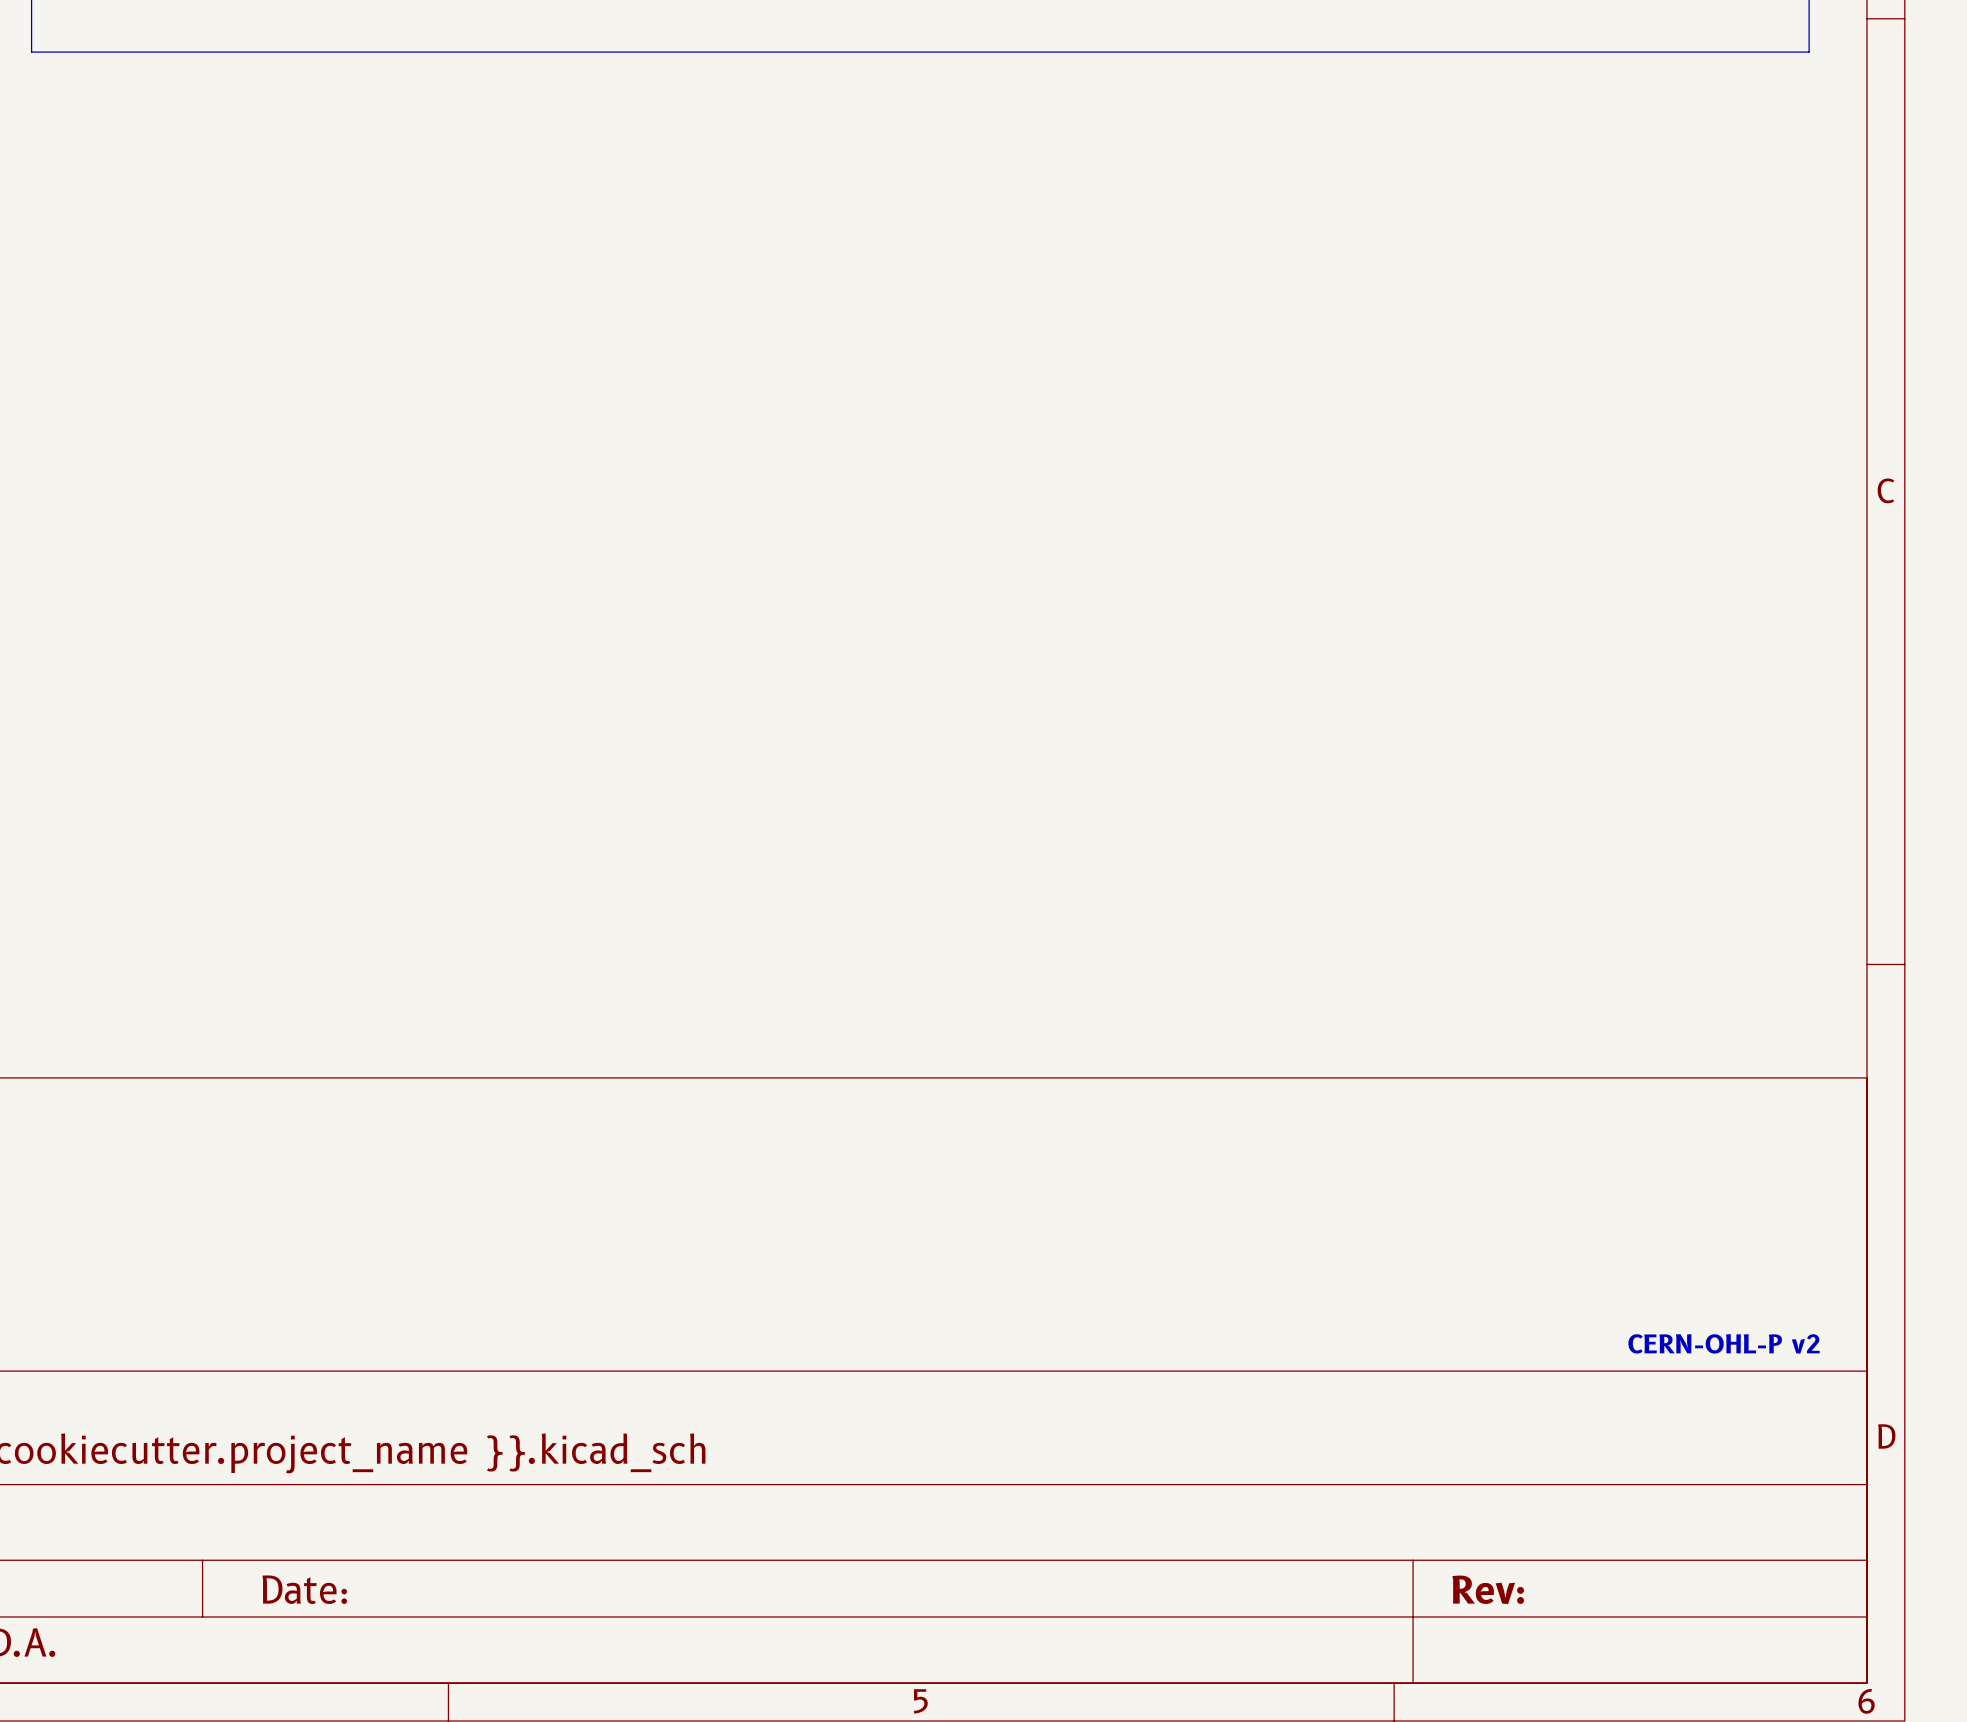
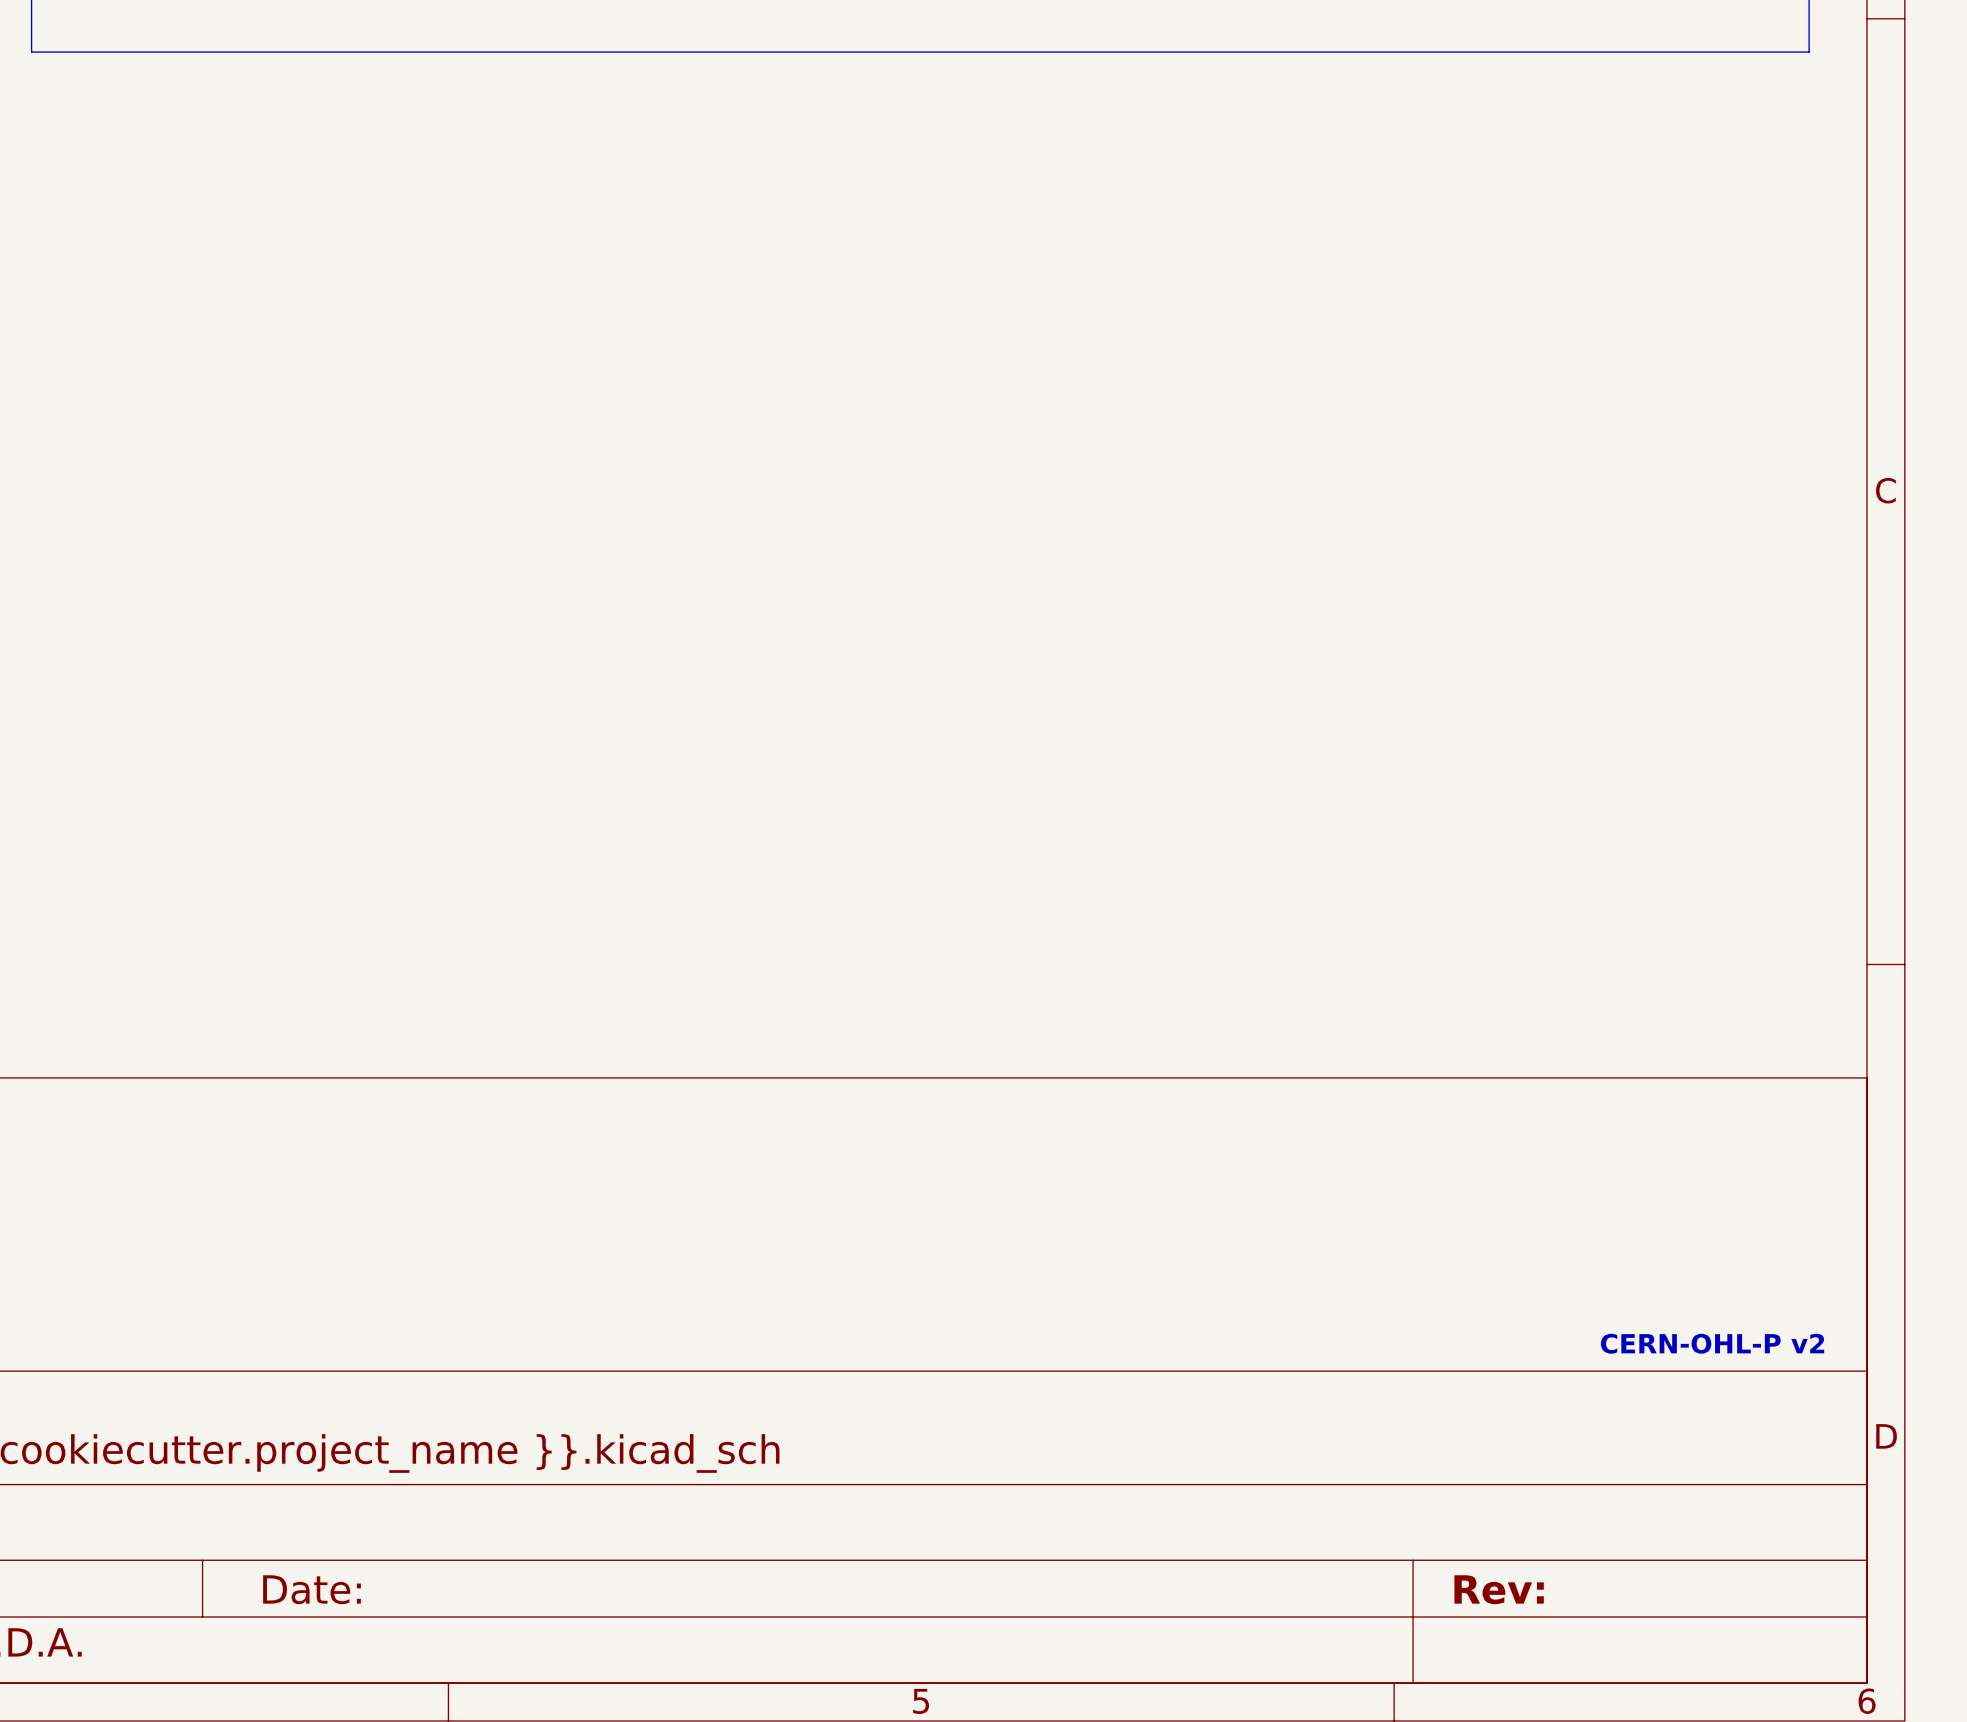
text position: CERN-OHL-P v2 (1724, 1343) -> CERN-OHL-P v2 (1712, 1343)

